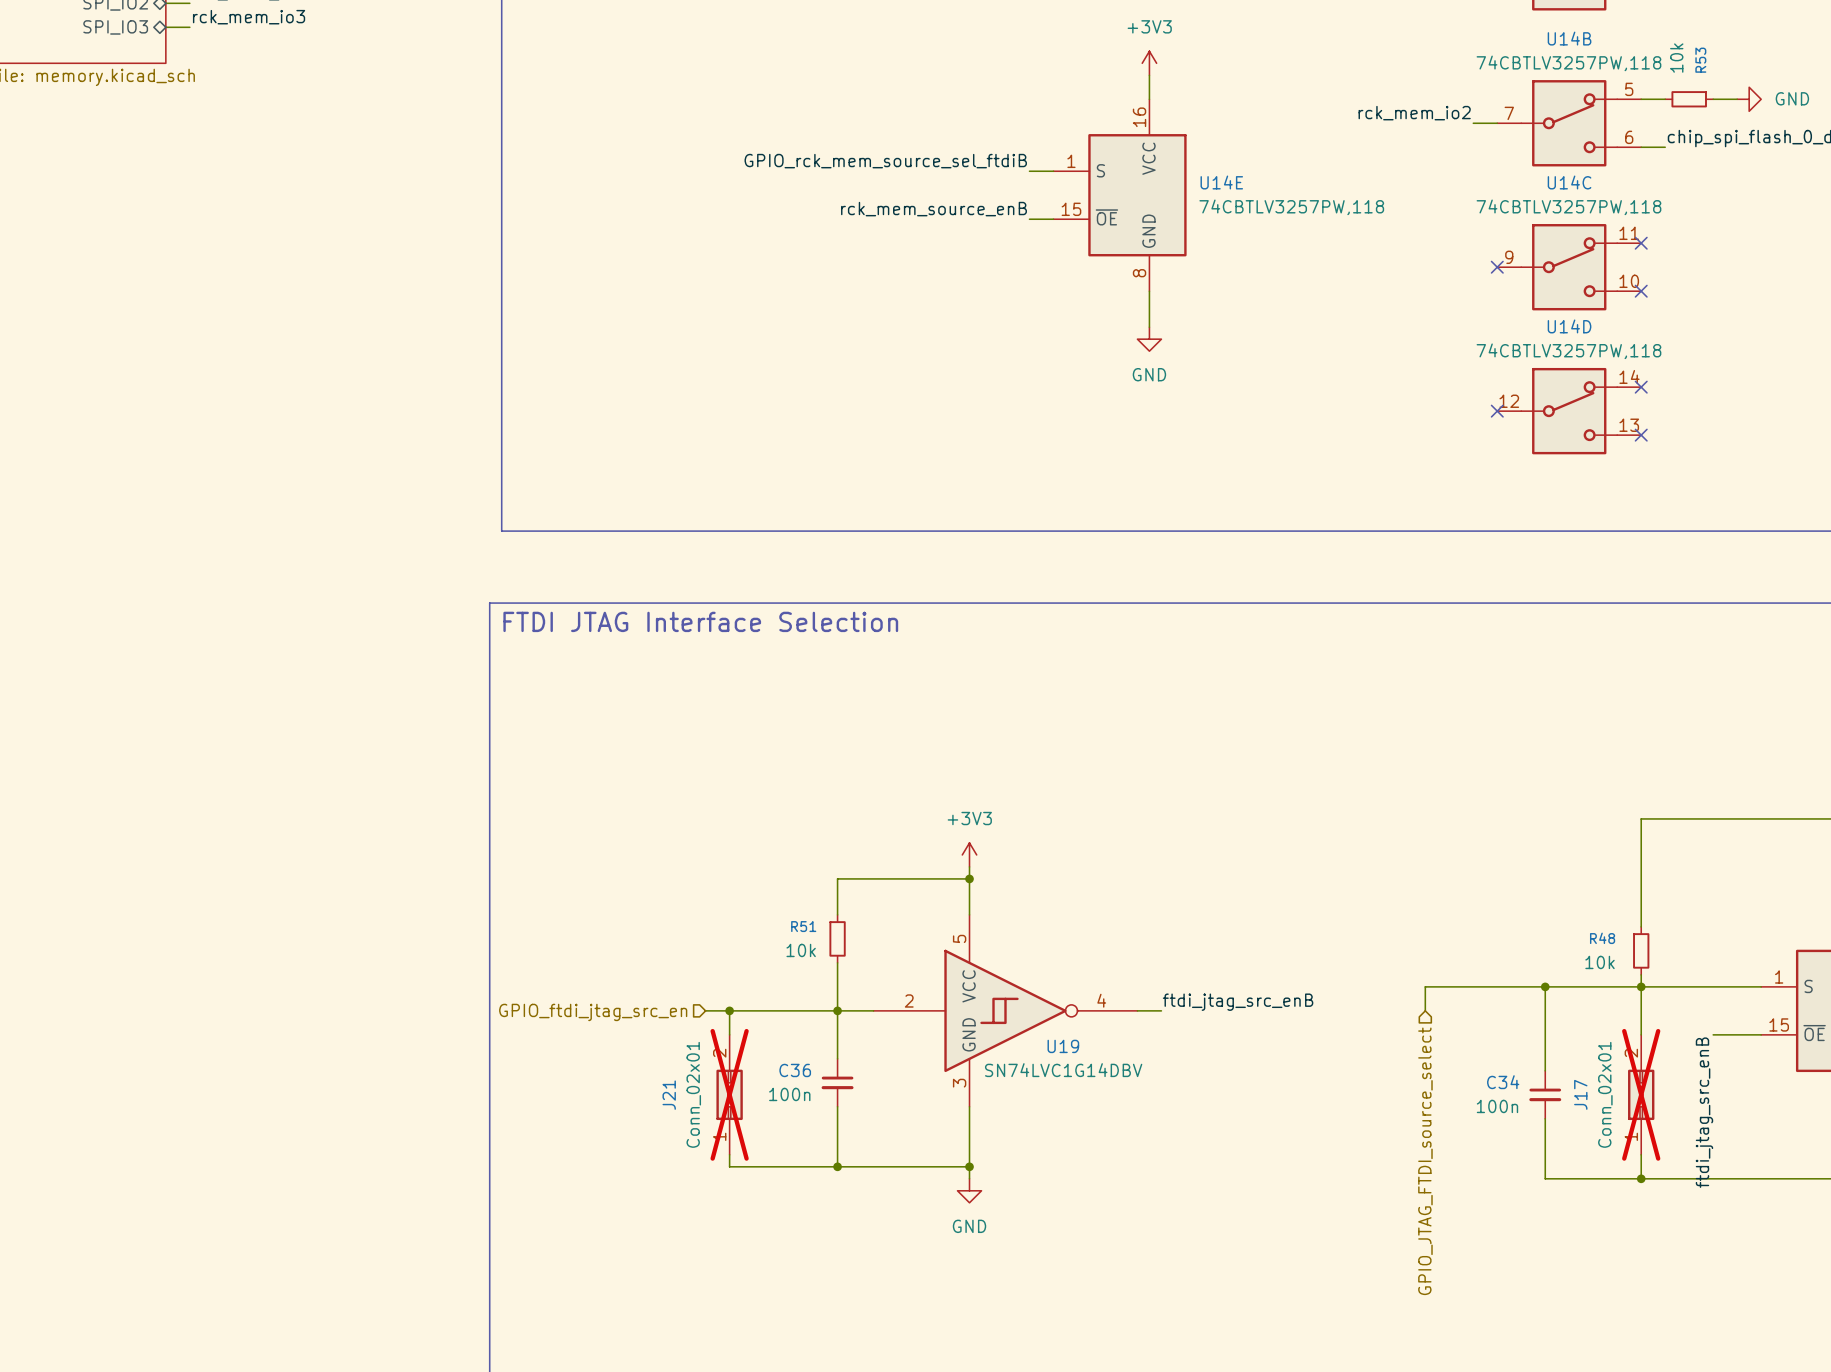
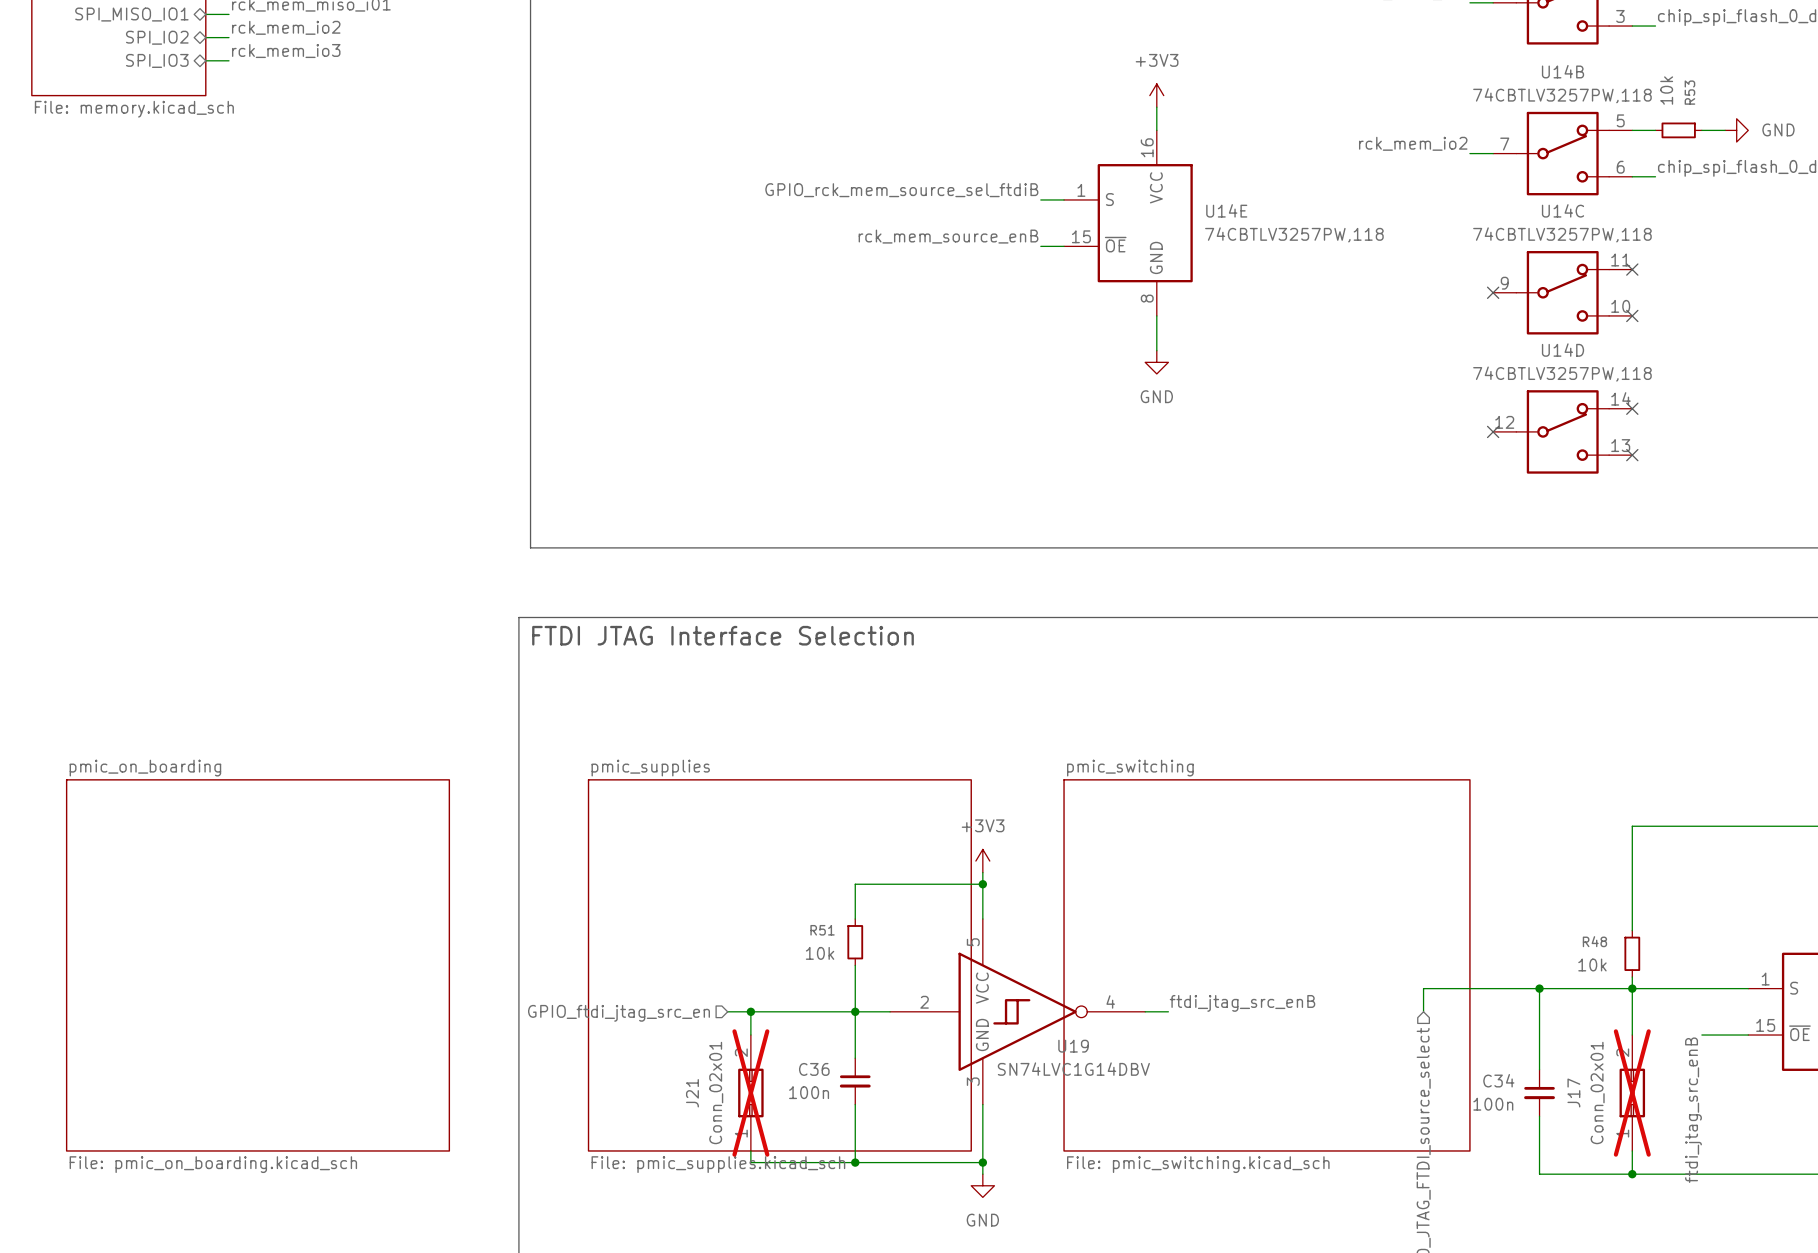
sheet pmic_on_boarding: none -> File: pmic_on_boarding.kicad_sch (257, 965)
sheet pmic_supplies: none -> File: pmic_supplies.kicad_sch (779, 965)
sheet pmic_switching: none -> File: pmic_switching.kicad_sch (1266, 965)

